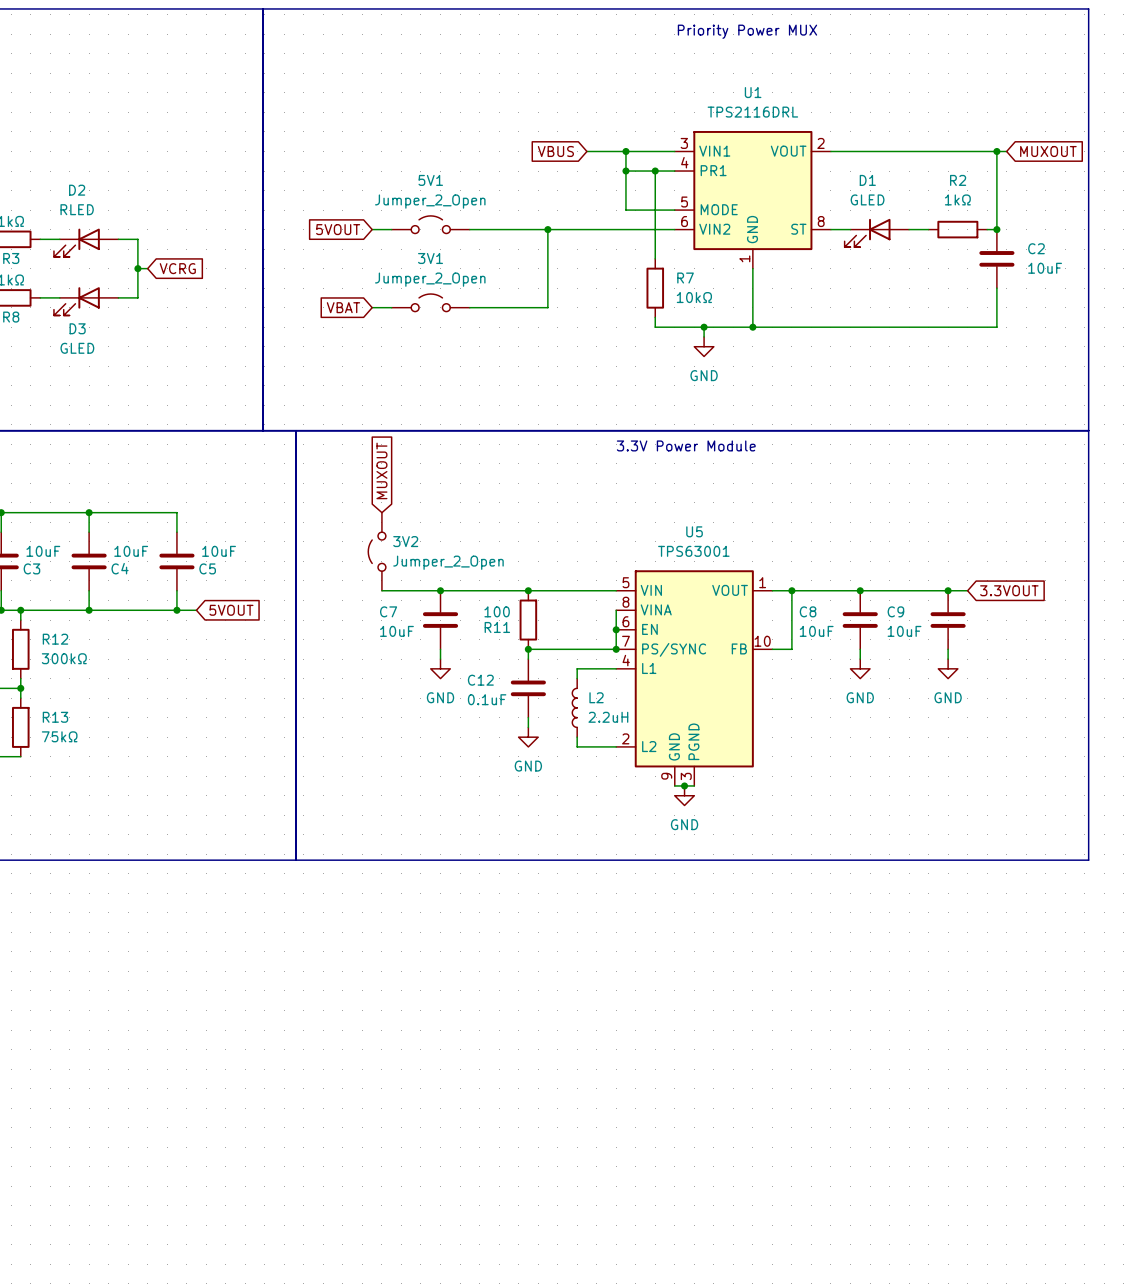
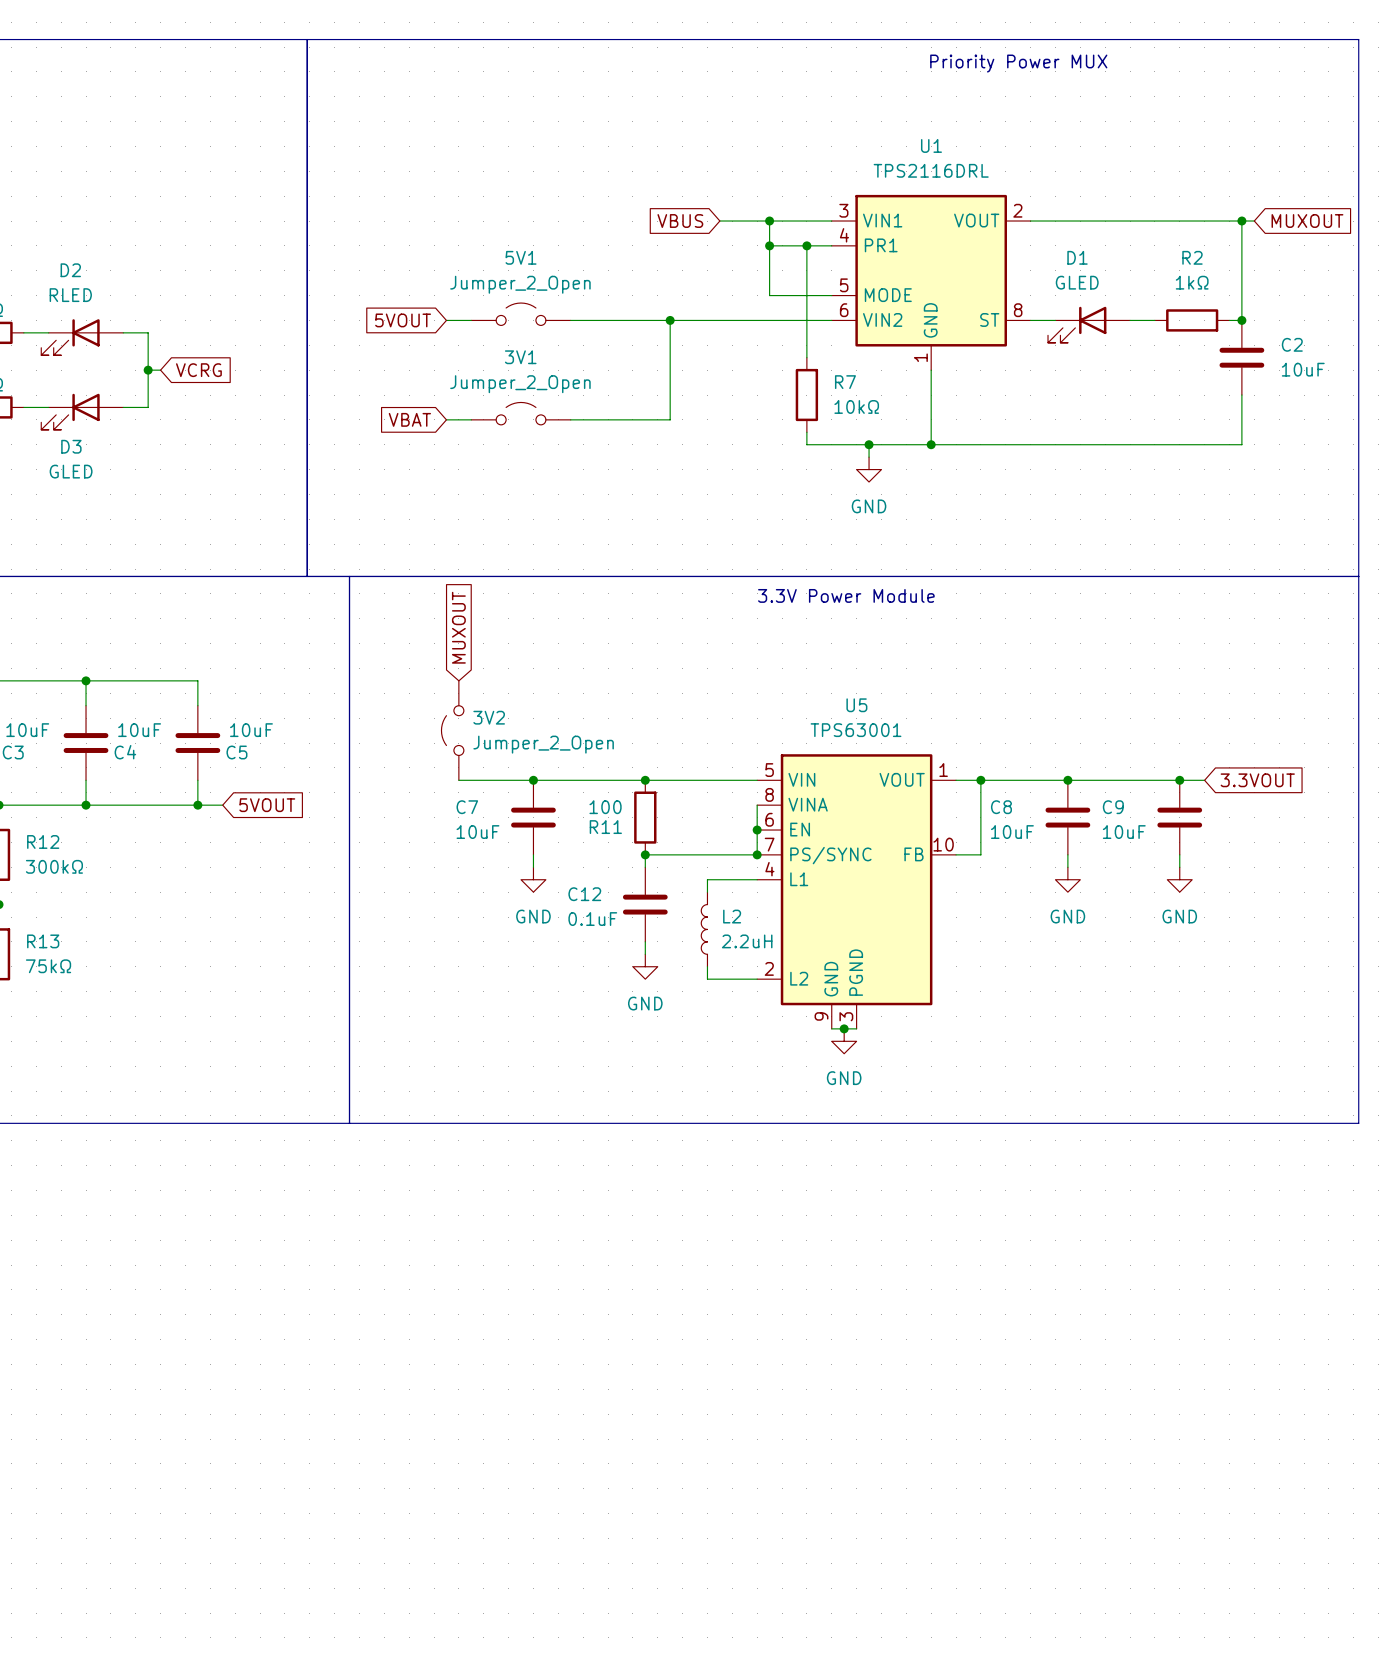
text position: Priority Power MUX (747, 31) -> Priority Power MUX (1018, 63)

